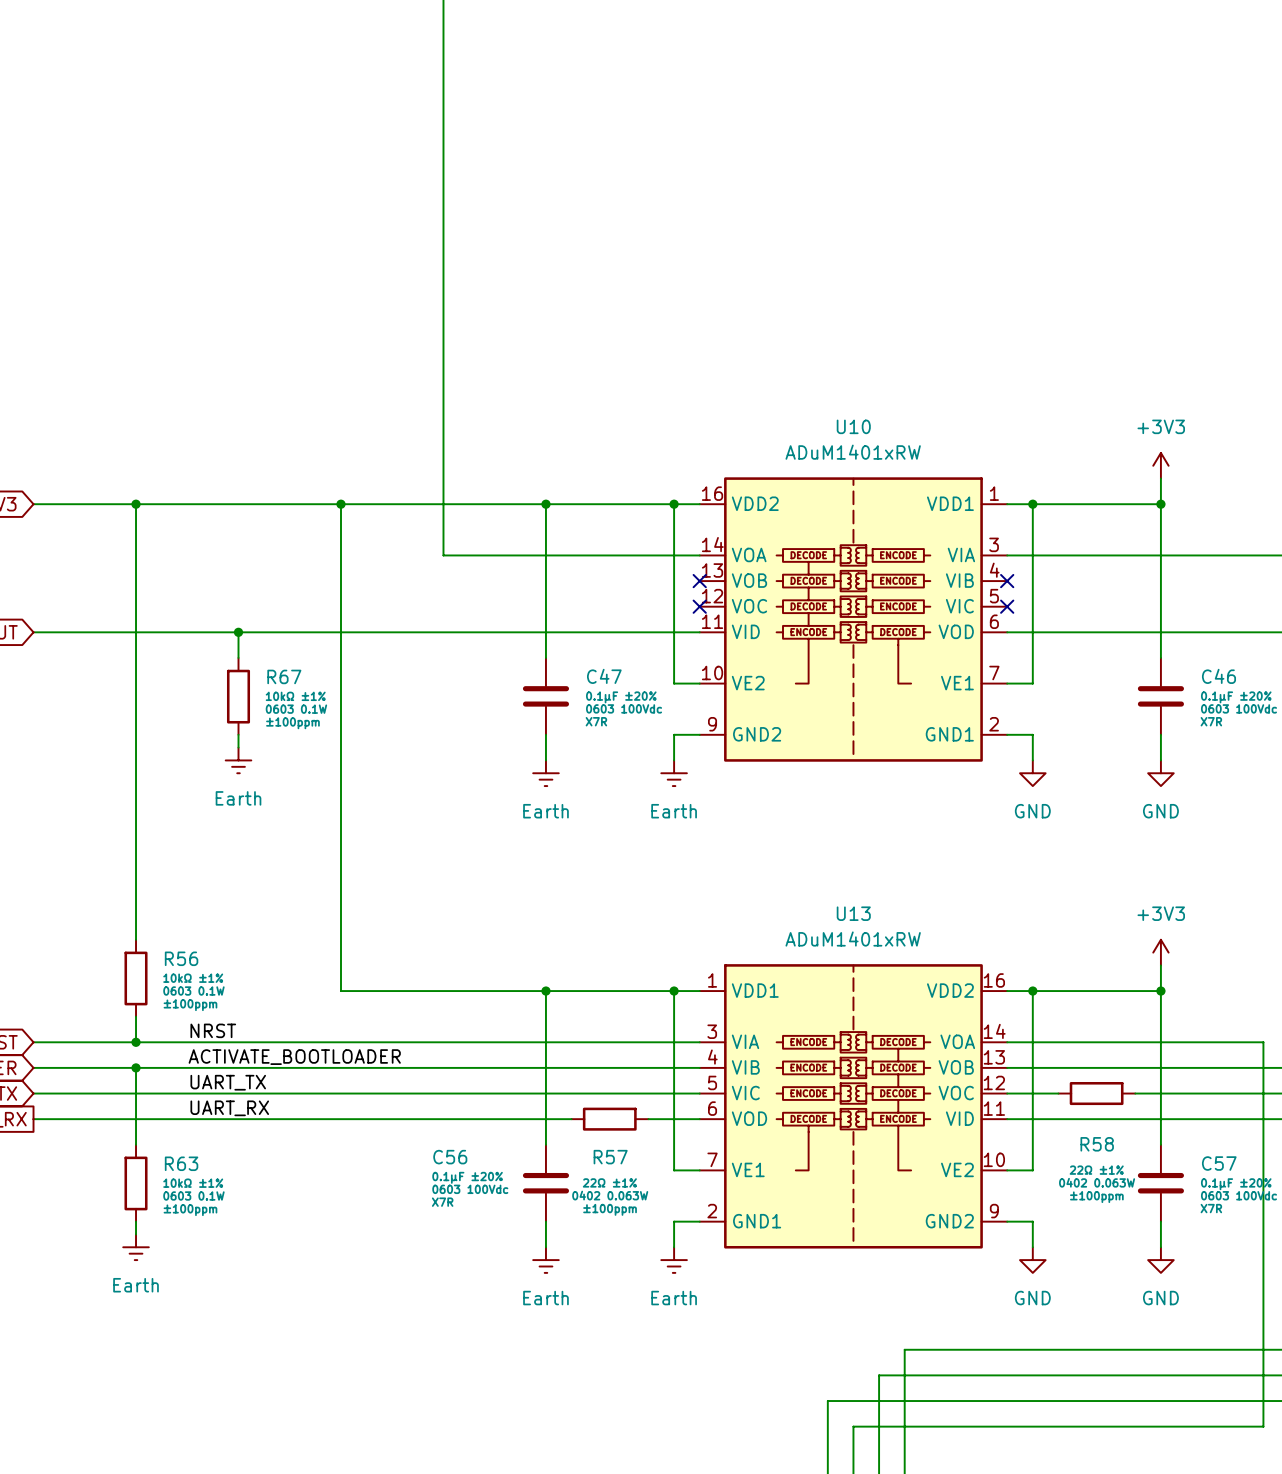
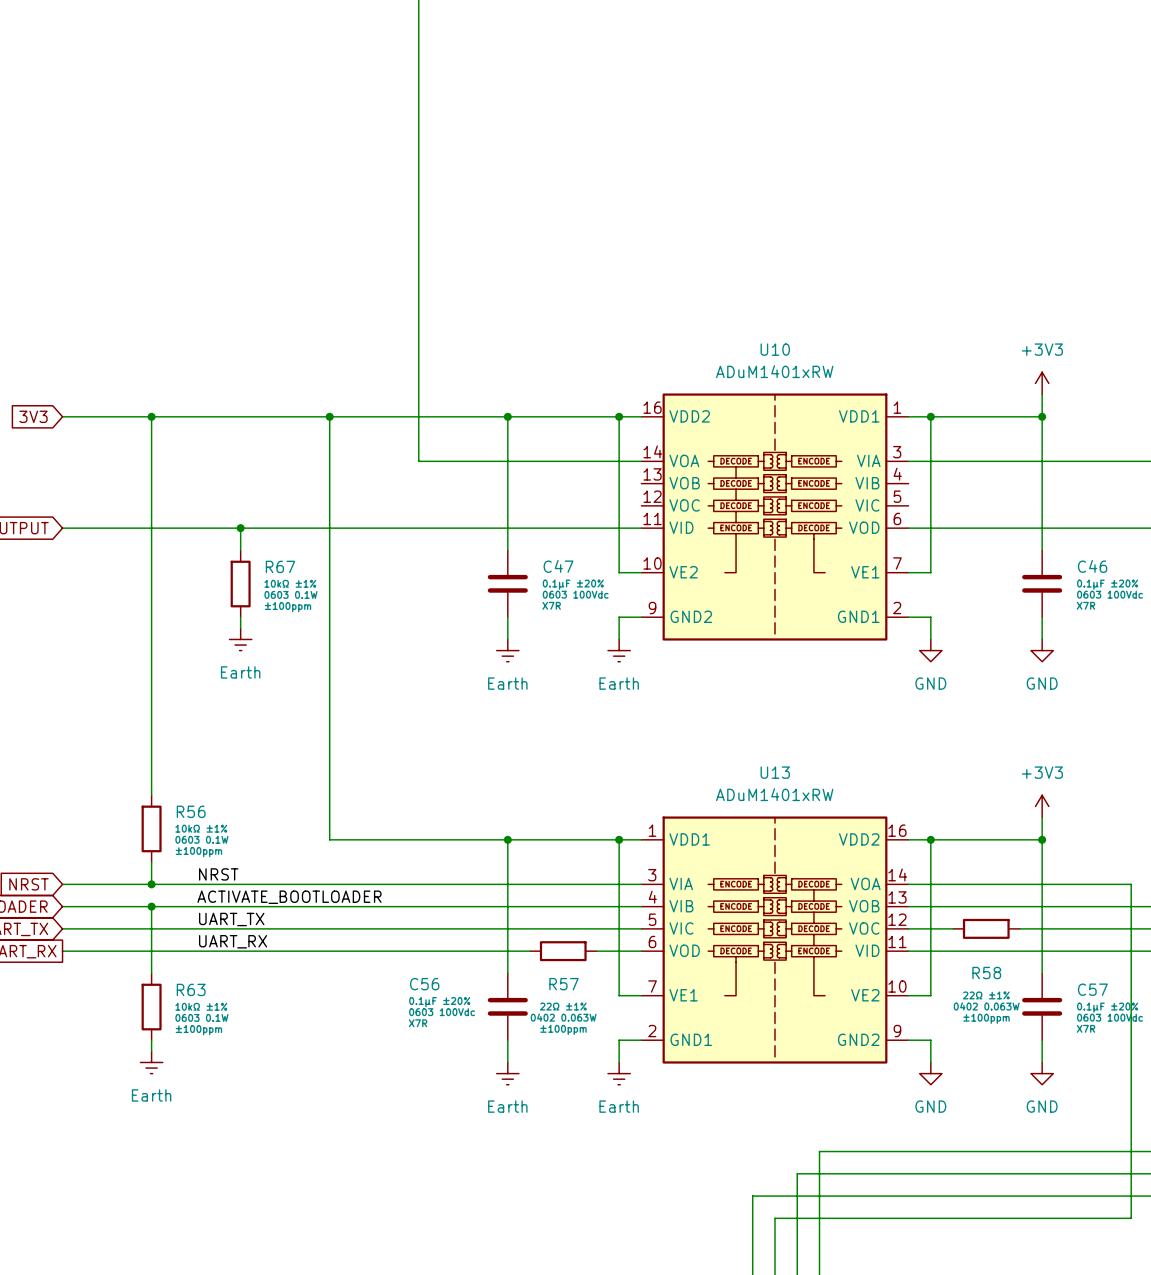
no-connect mark: (699, 581) -> none
no-connect mark: (1007, 581) -> none
no-connect mark: (699, 606) -> none
no-connect mark: (1007, 606) -> none

